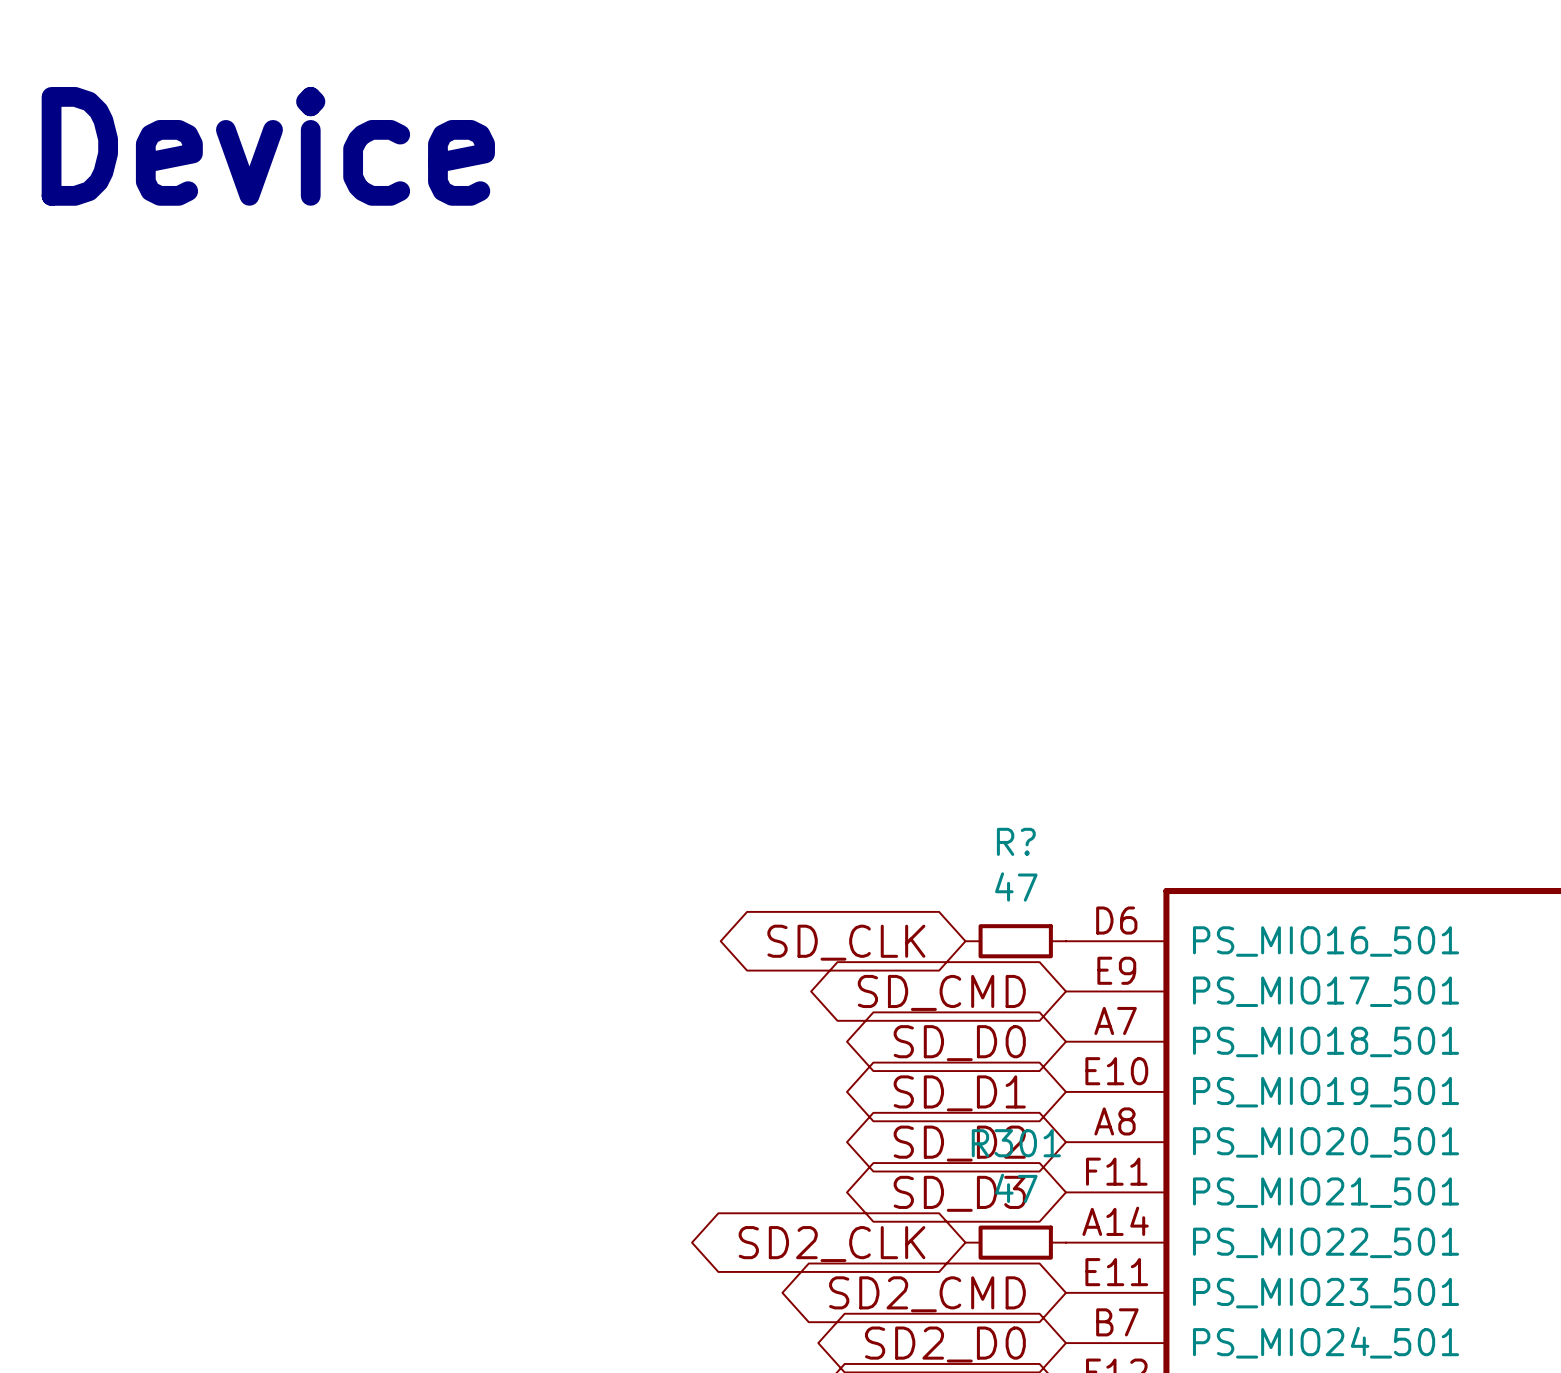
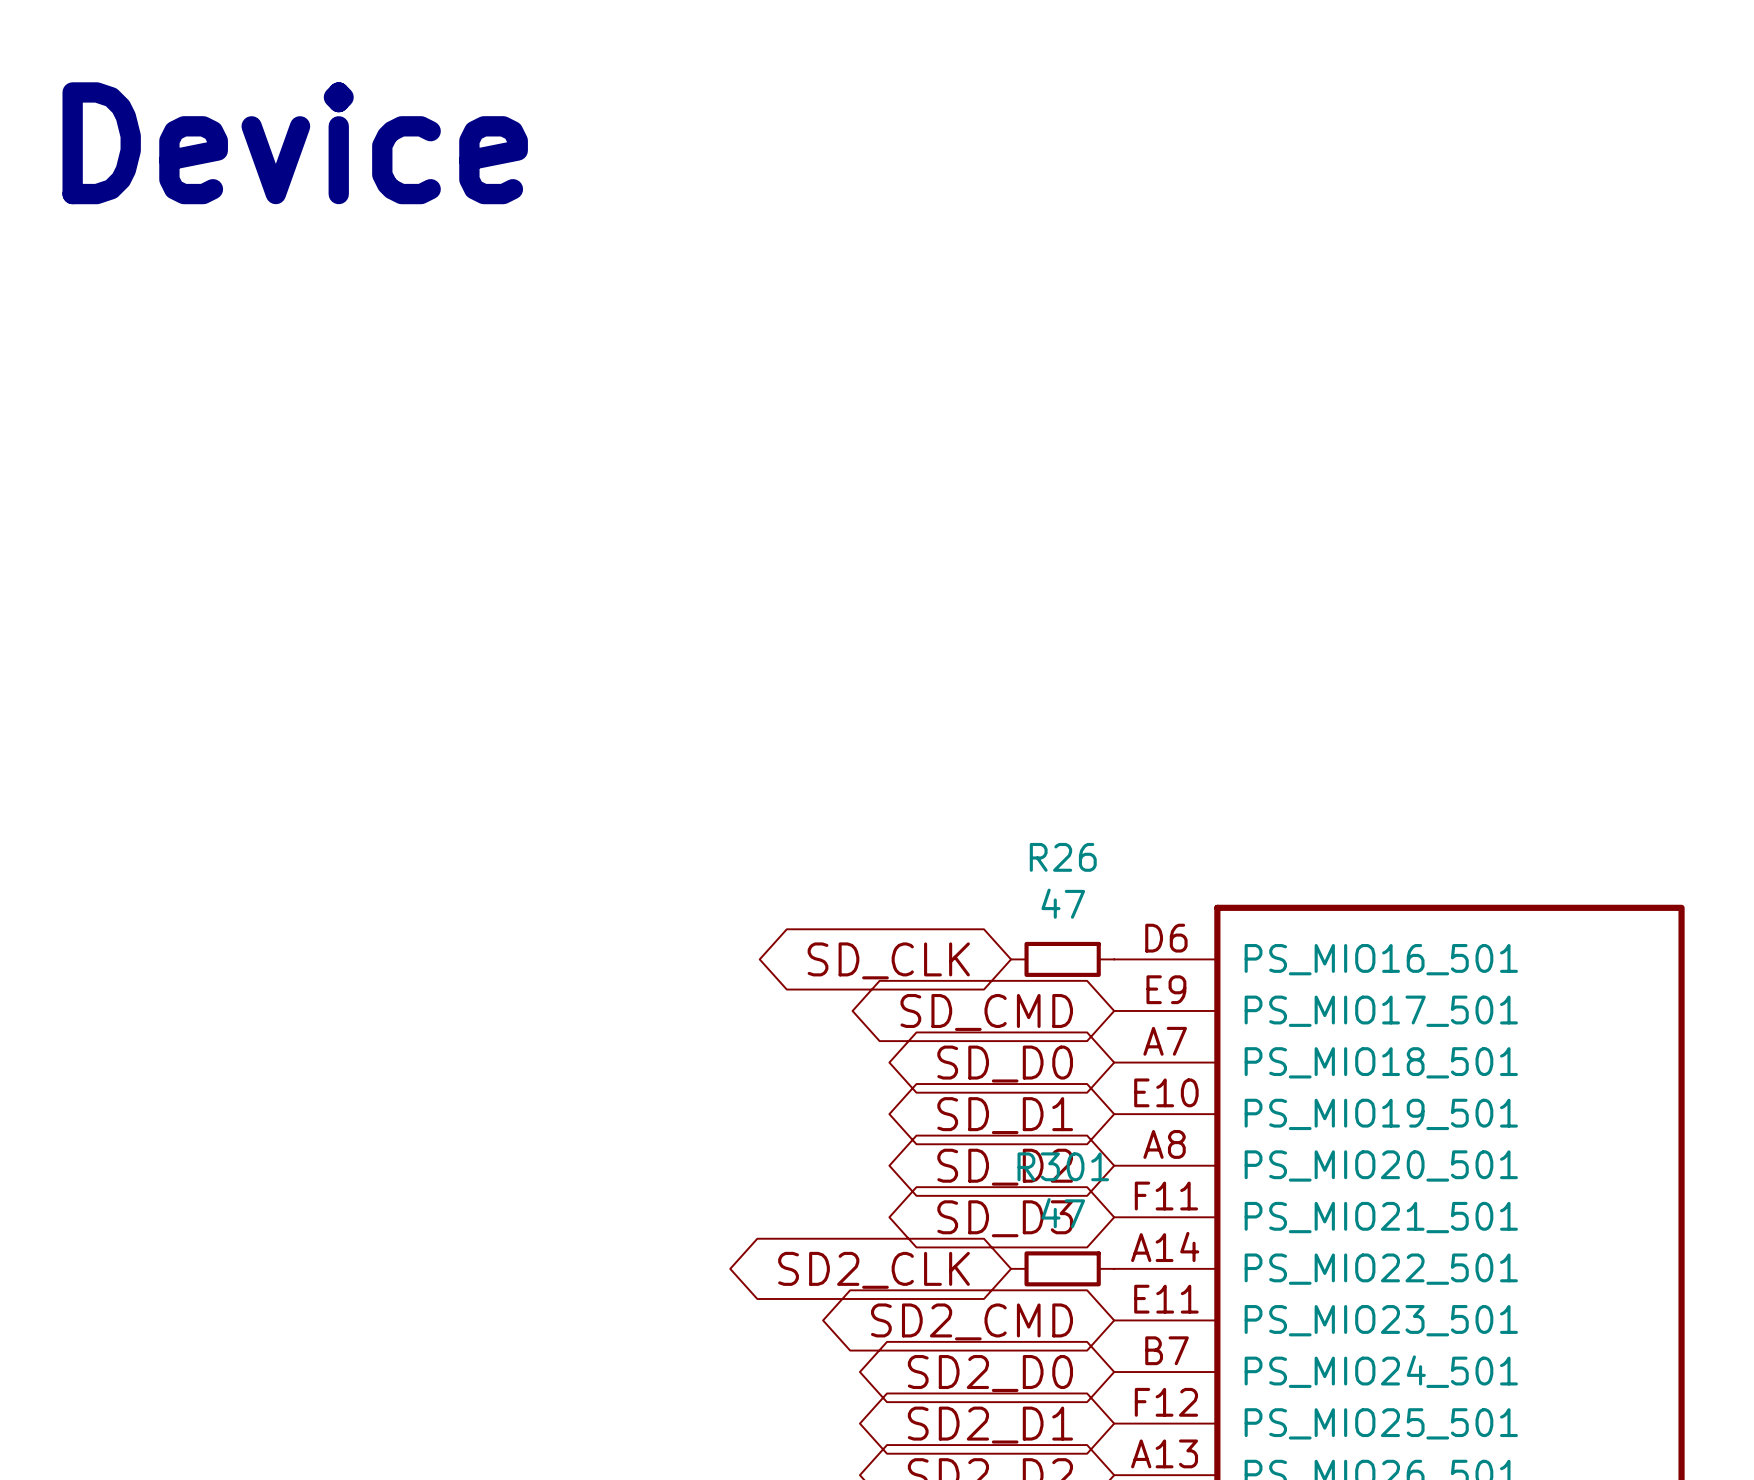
R? name: R? (1016, 841) -> R26 (1063, 857)

